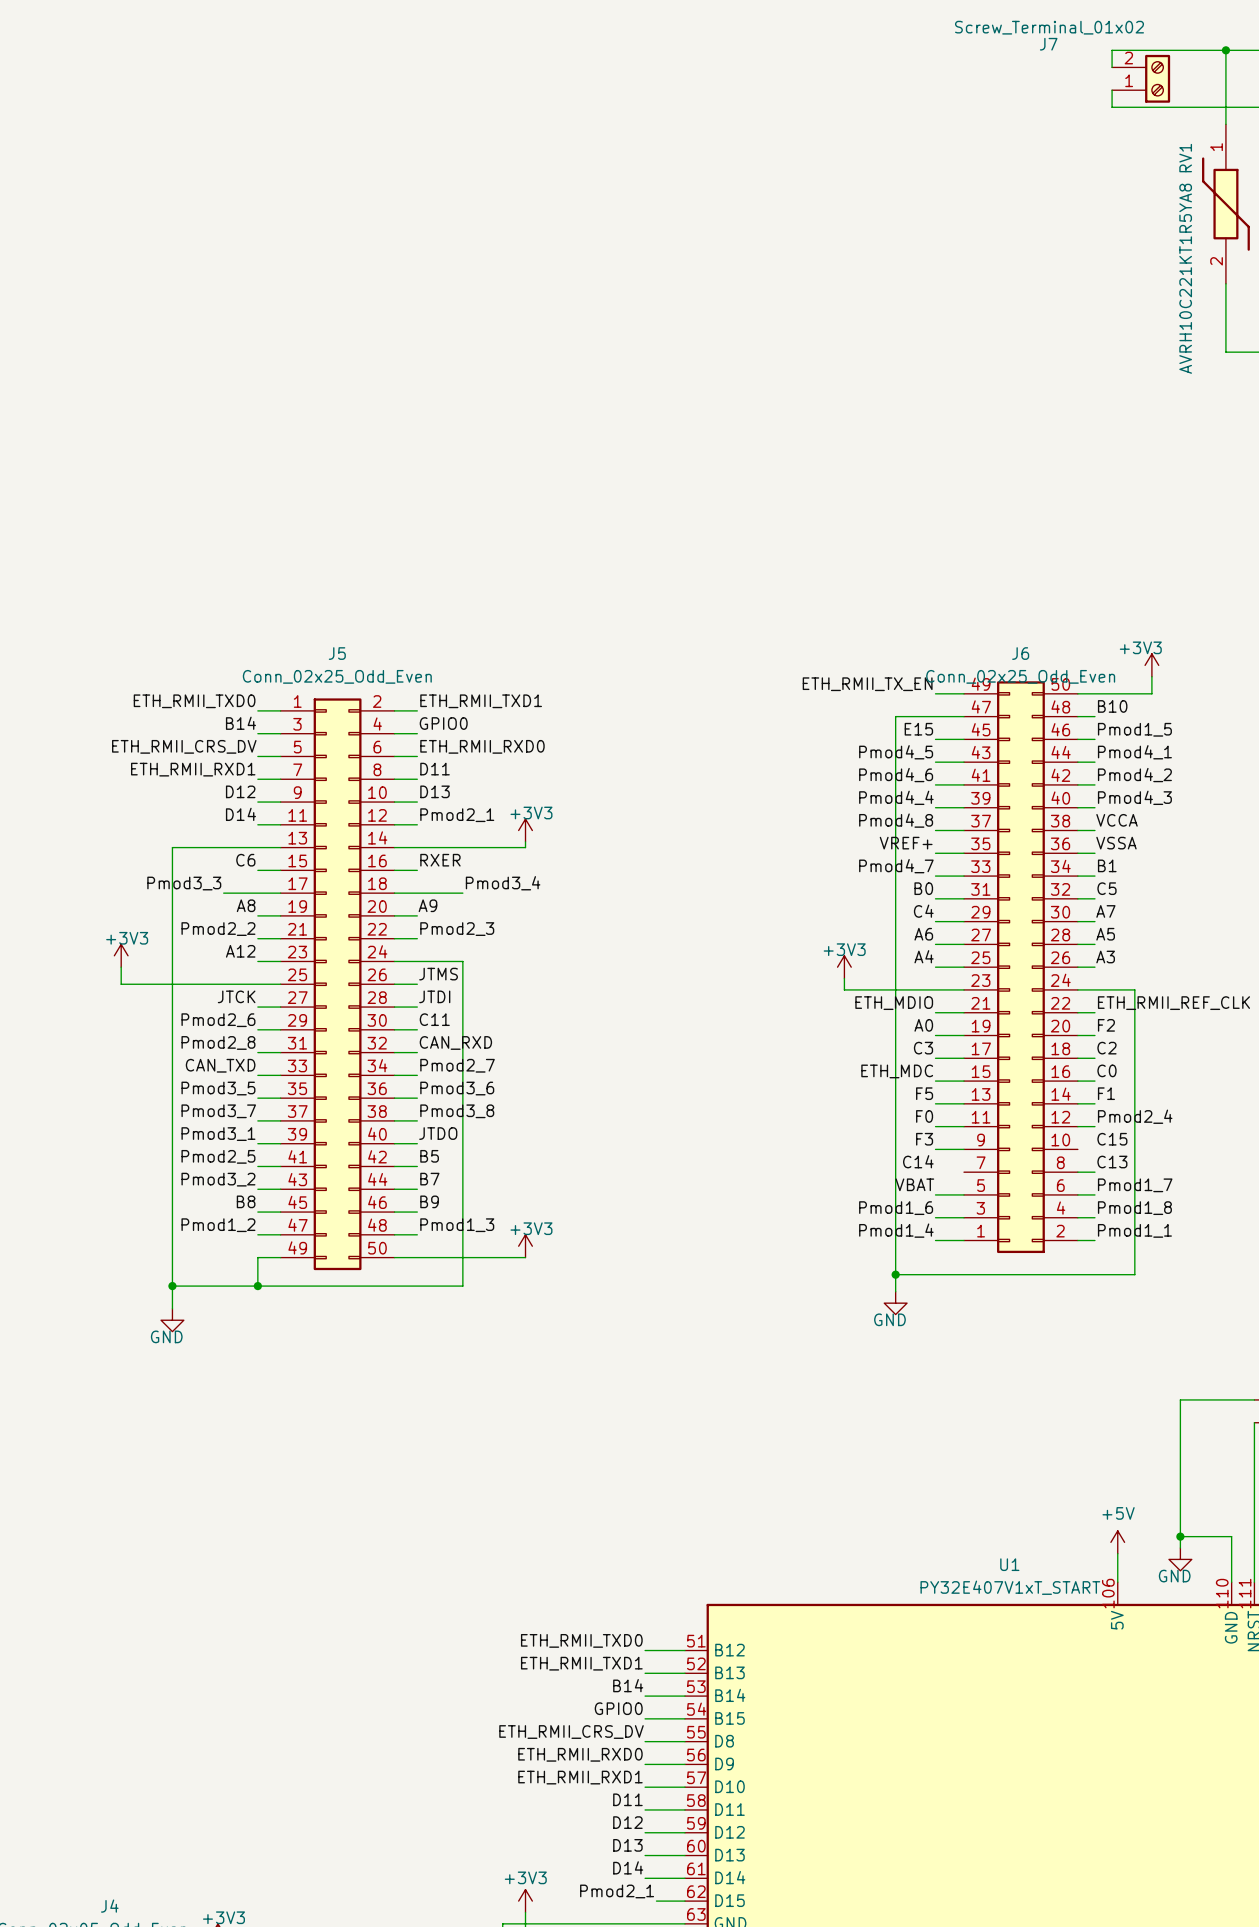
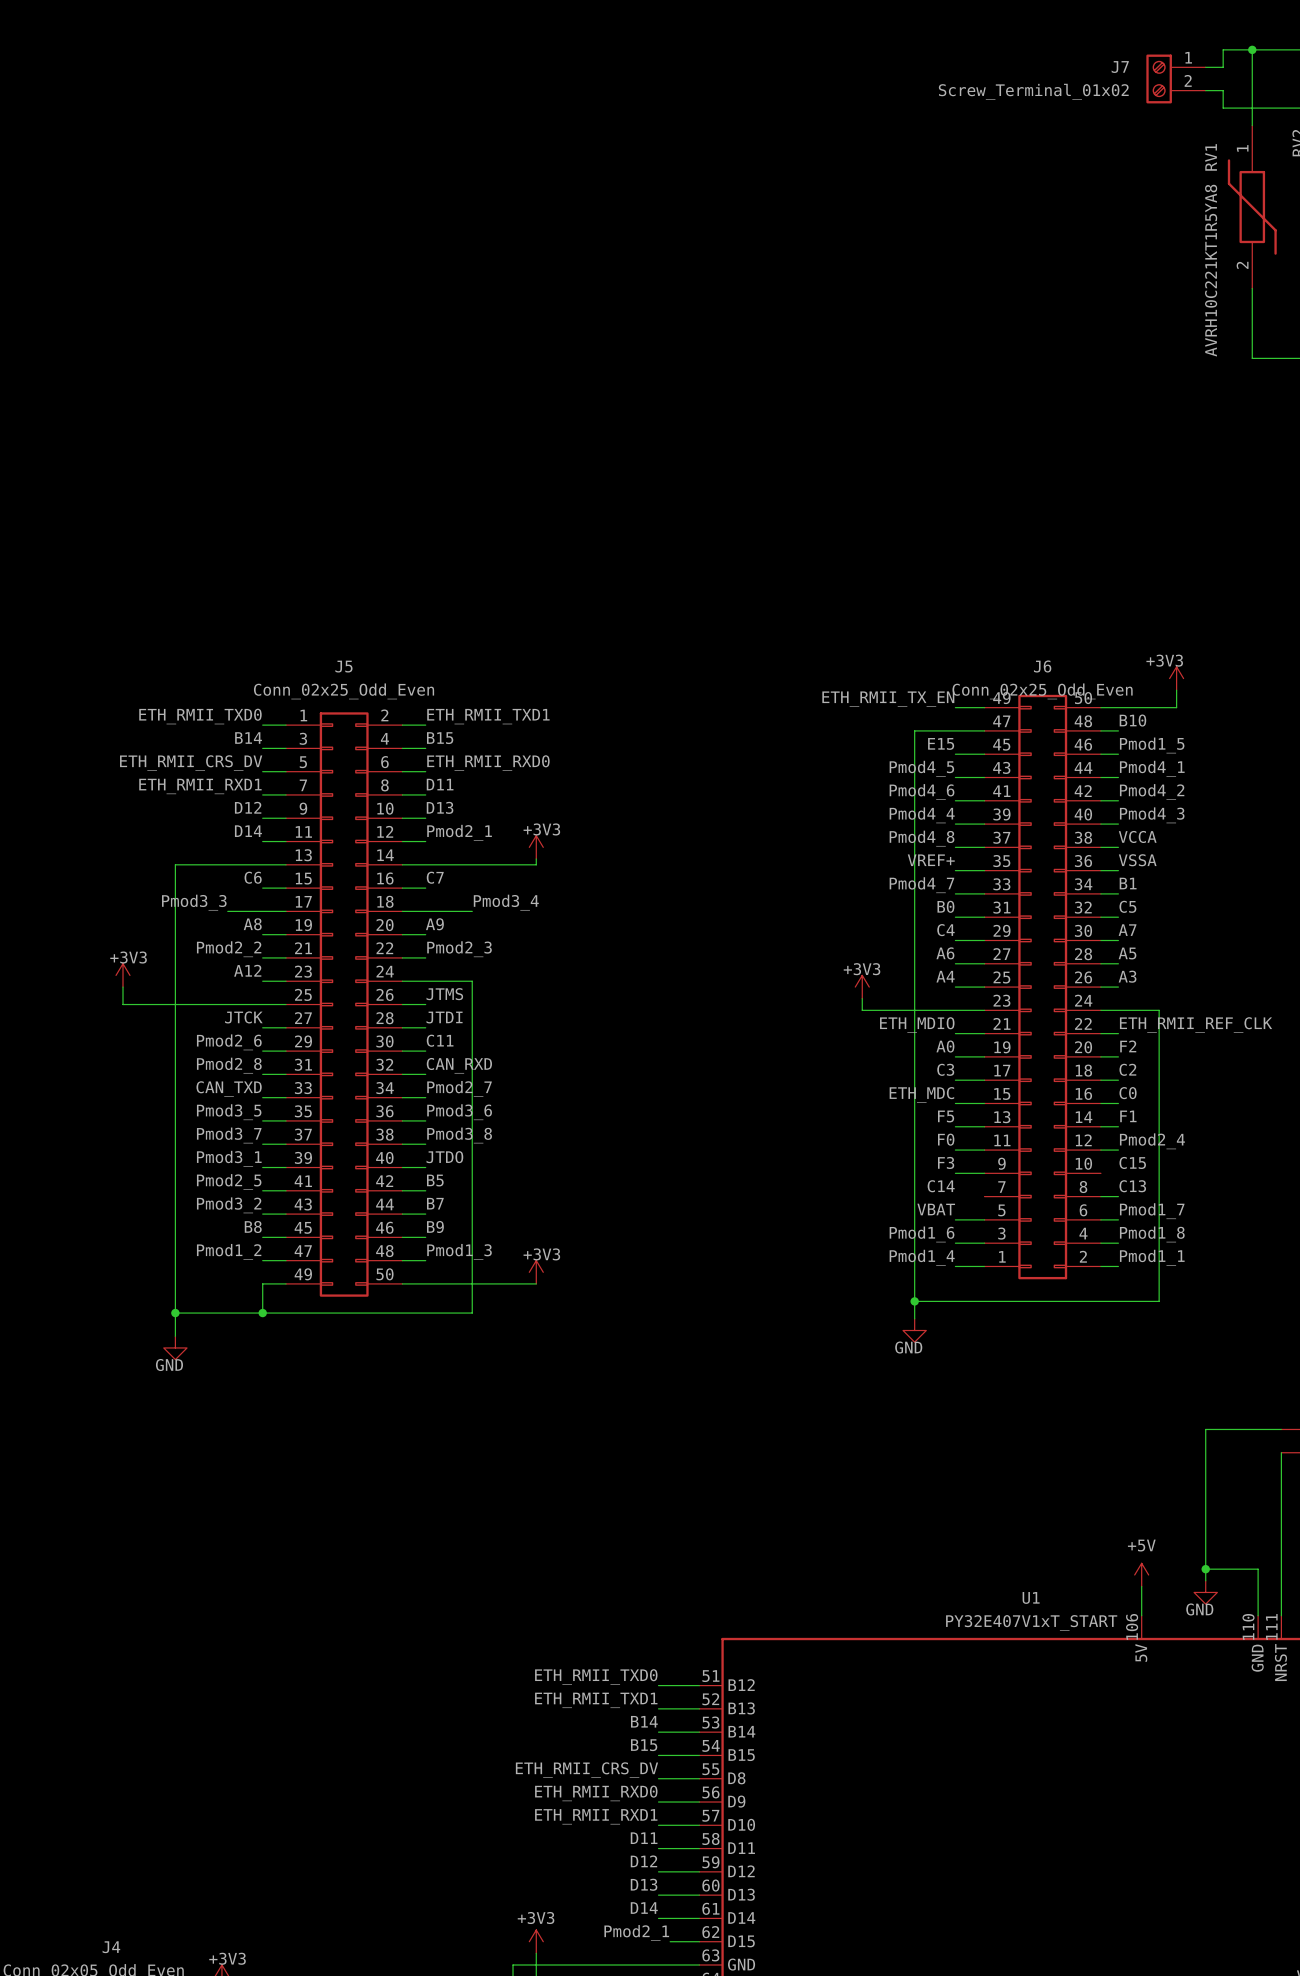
J7 value position: Screw_Terminal_01x02 (1049, 27) -> Screw_Terminal_01x02 (1033, 91)
J7 name position: J7 (1048, 44) -> J7 (1120, 67)
wire: (1197, 50) (1112, 50) (1112, 67) -> (1223, 49) (1223, 67) (1205, 67)
J7 rotation: 0° (1157, 78) -> 180° (1159, 78)
wire: (1112, 90) (1112, 107) (1197, 107) -> (1205, 90) (1223, 90) (1223, 108)
label: GPIO0 (443, 723) -> B15 (440, 738)
label: RXER (440, 860) -> C7 (435, 877)
label: GPIO0 (618, 1708) -> B15 (644, 1745)

